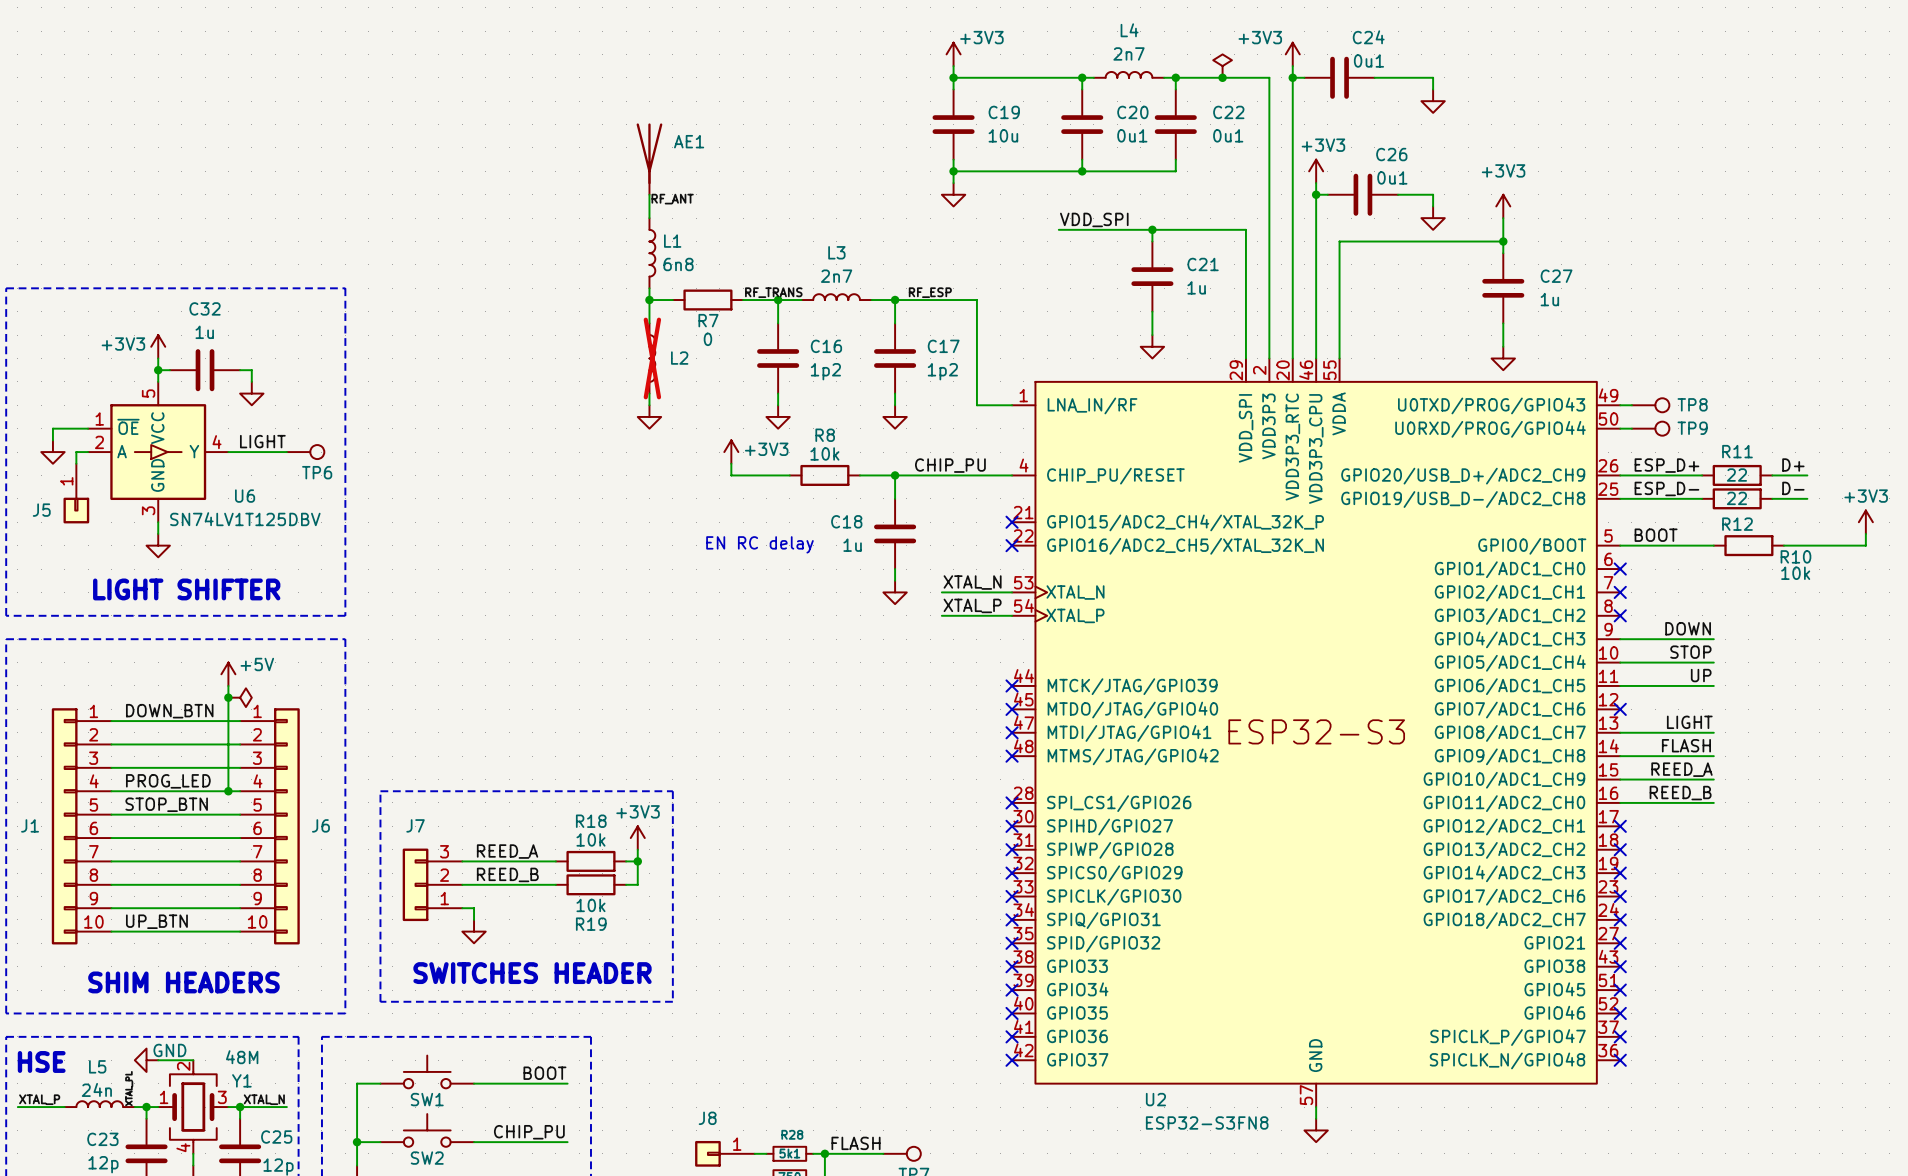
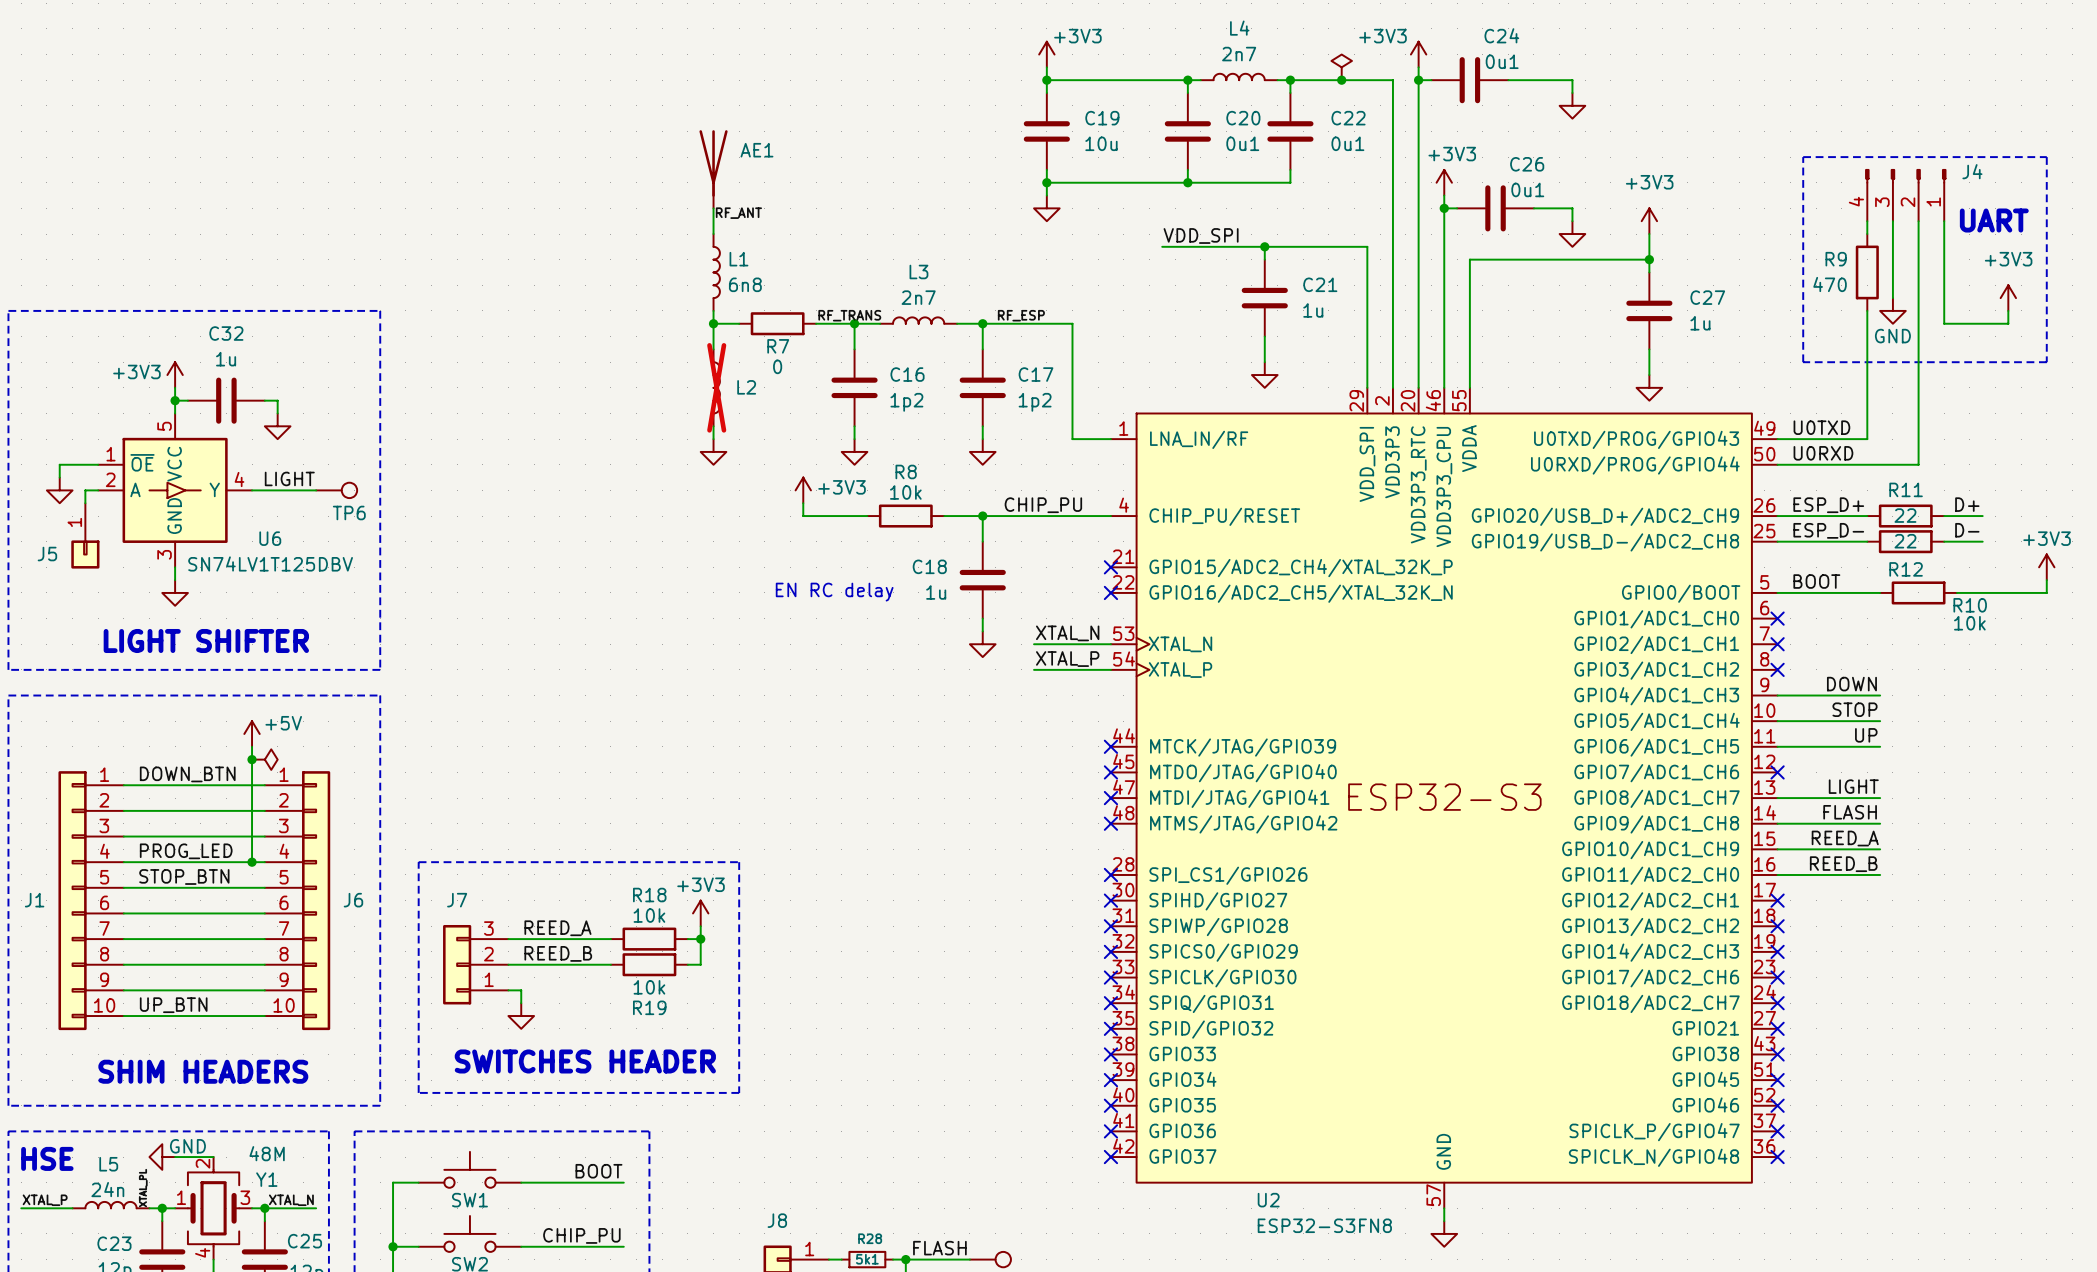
line: none -> (1803, 157) (2046, 157) (2046, 362) (1803, 362) (1803, 157)
J4: none -> (1905, 195)
text: none -> UART (1994, 220)
wire: none -> (1867, 221) (1867, 234)
wire: none -> (1892, 221) (1892, 298)
wire: none -> (1918, 221) (1918, 464) (1790, 464)
wire: none -> (1944, 221) (1944, 323) (2008, 323) (2008, 310)
R9: none -> 470 (1867, 272)
power symbol: none -> +3V3 (2008, 298)
wire: none -> (1867, 310) (1867, 439) (1790, 439)
power symbol: none -> GND (1892, 310)
label: none -> U0TXD (1821, 427)
TP8: (1650, 405) -> none
label: none -> U0RXD (1823, 453)
TP9: (1650, 428) -> none

